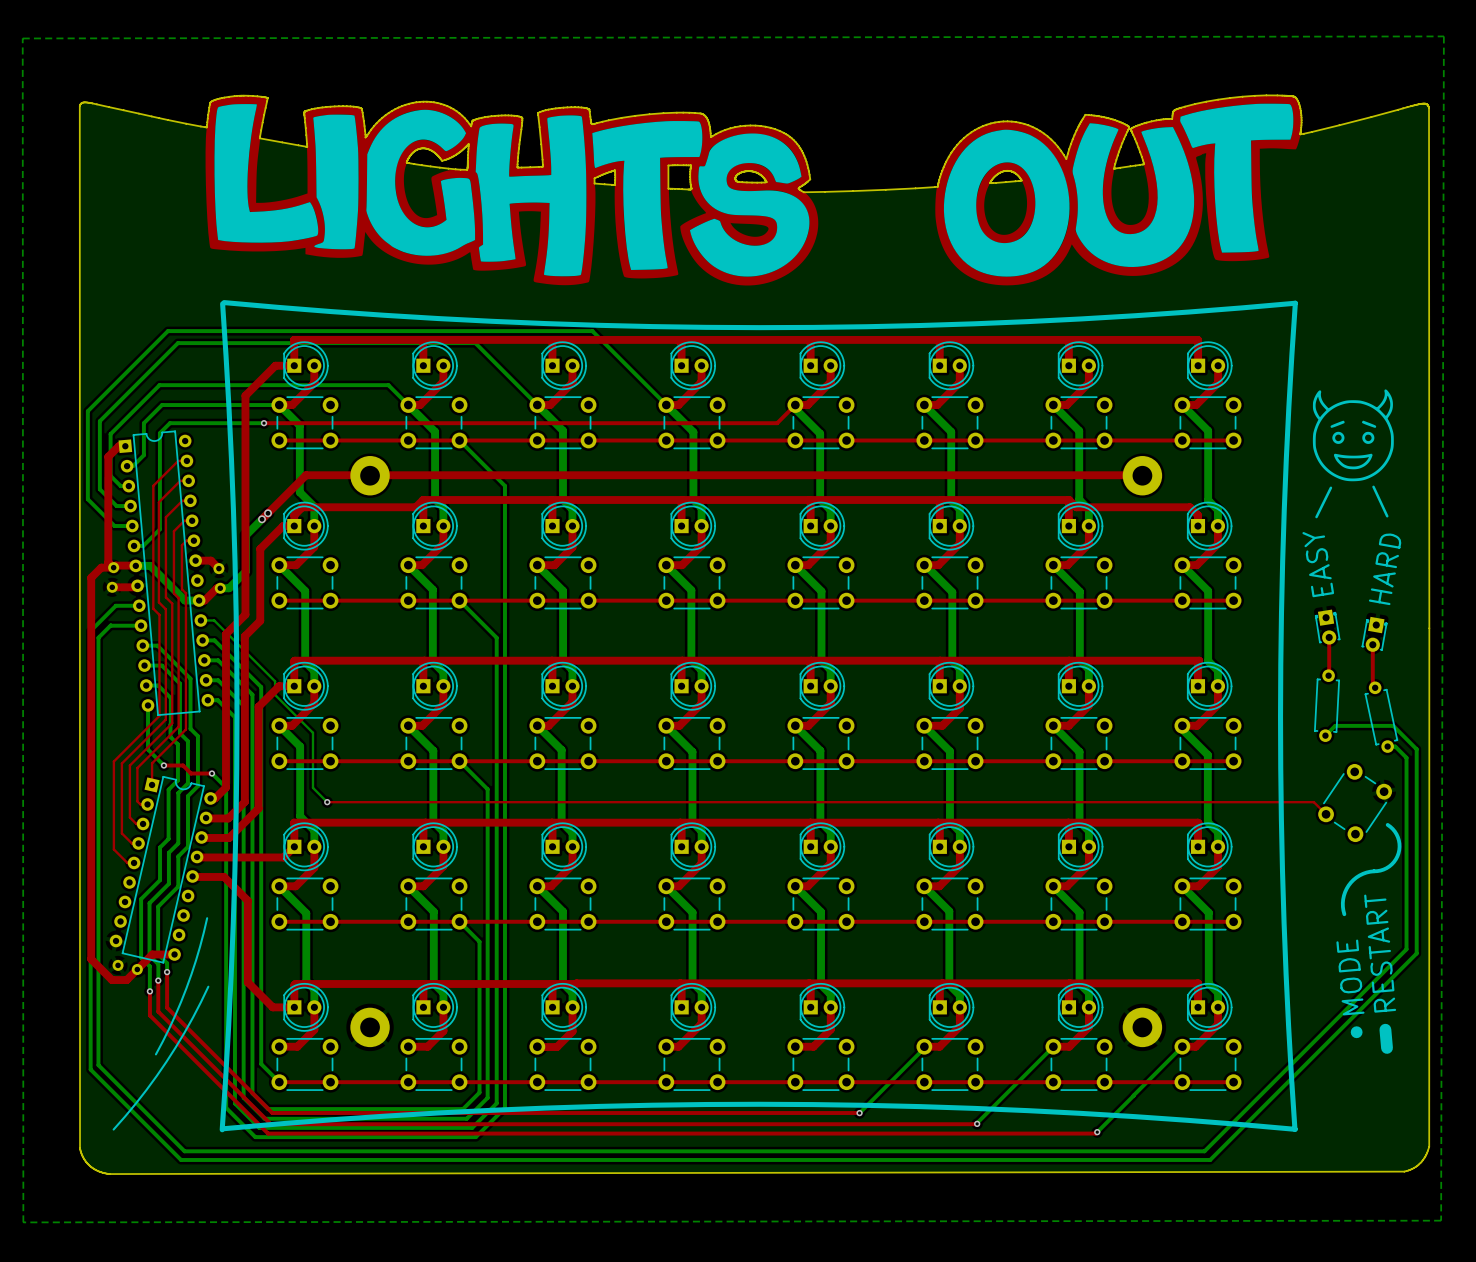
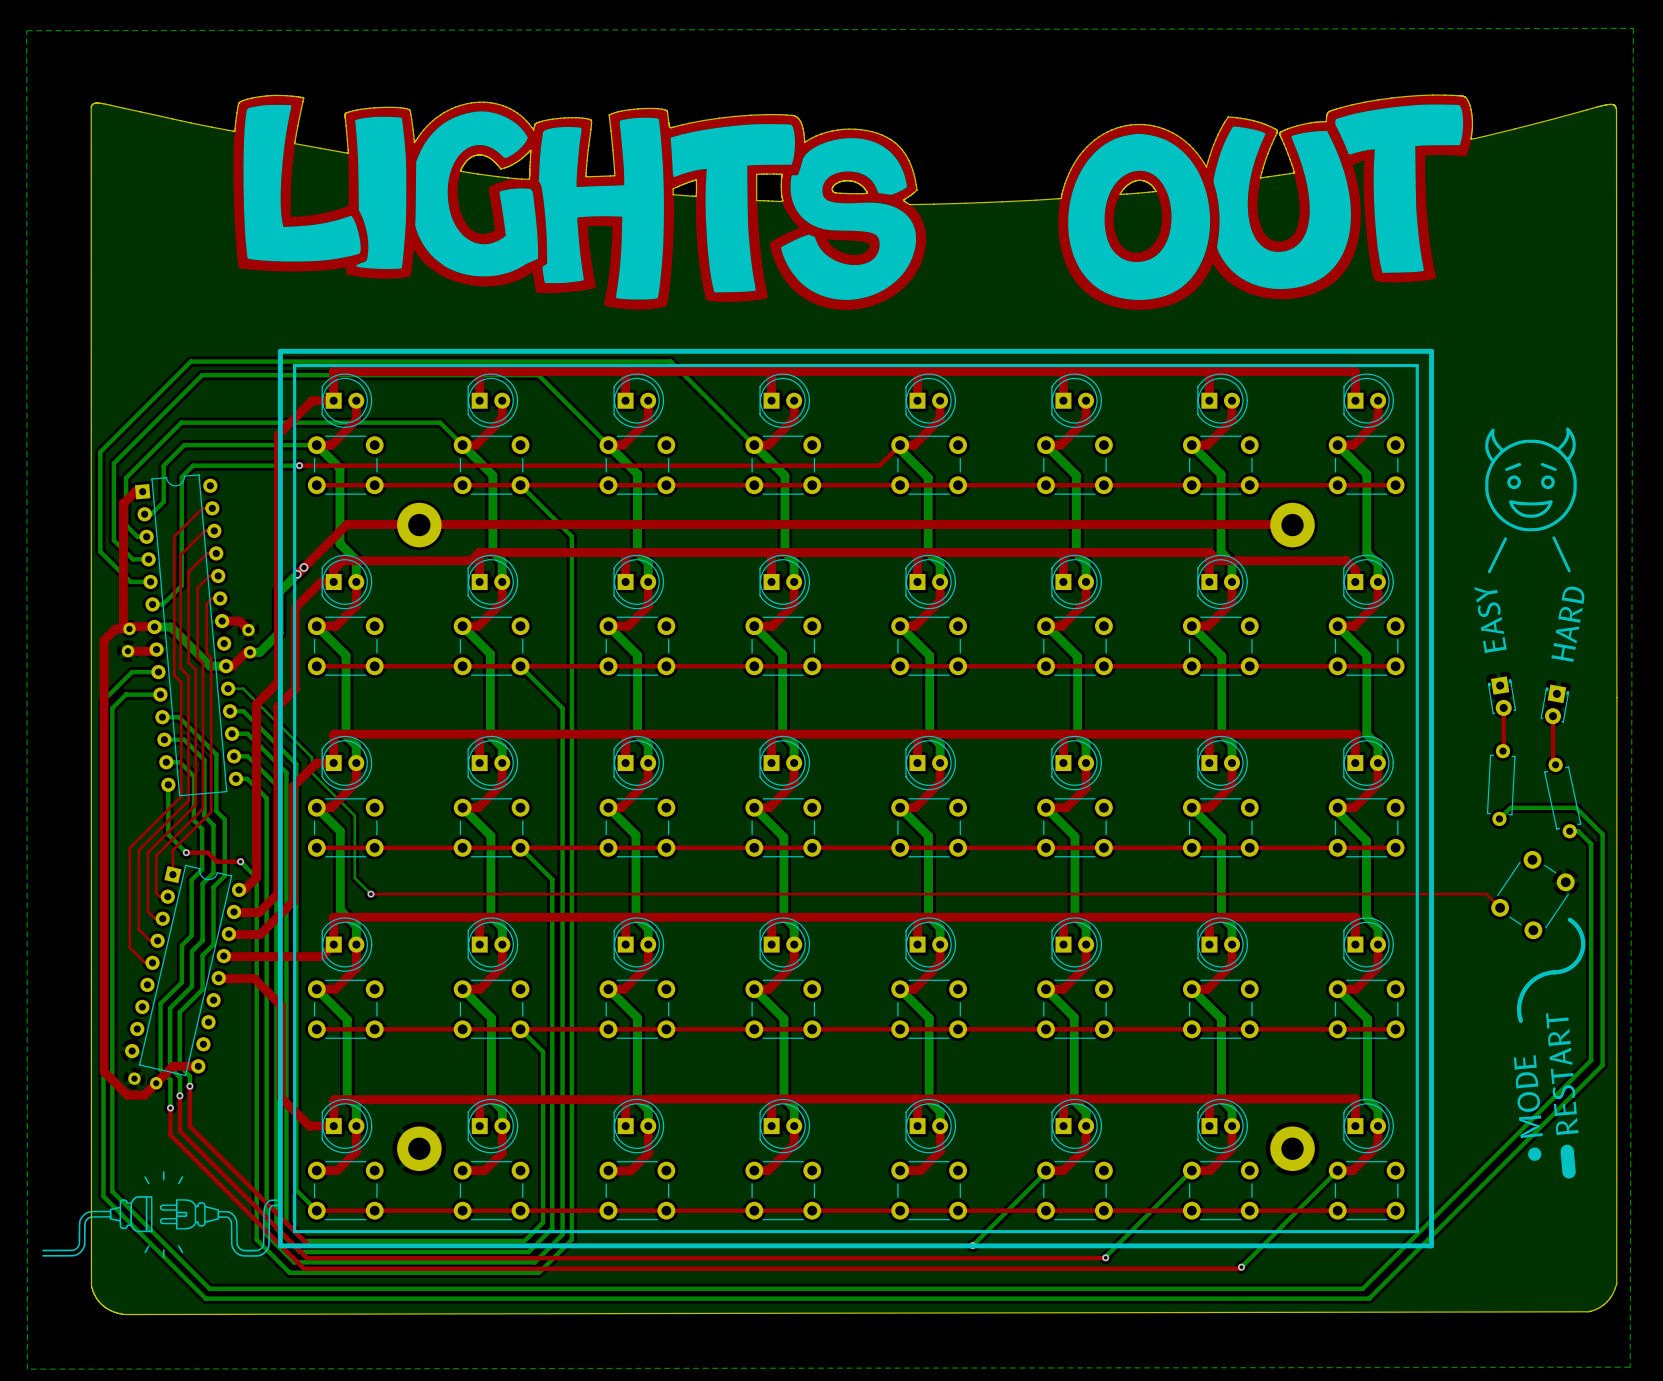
line: (224, 302) (491, 321) (759, 327) (1027, 321) (1295, 303) (1284, 509) (1280, 716) (1284, 922) (1294, 1129) -> none
line: (222, 303) (233, 510) (237, 716) (233, 923) (222, 1129) -> none
line: none -> (280, 351) (1431, 351) (1431, 1245) (280, 1245) (280, 351)
line: none -> (294, 365) (1417, 365) (1417, 1231) (294, 1231) (294, 365)
line: (207, 918) (186, 988) (155, 1054) -> none
line: (208, 986) (184, 1032) (166, 1061) (136, 1103) (113, 1129) -> none
drawing: none -> [162, 1171, 165, 1181]
drawing: none -> [144, 1176, 150, 1185]
drawing: none -> [177, 1176, 184, 1185]
drawing: none -> [42, 1196, 278, 1259]
line: (224, 1128) (491, 1110) (759, 1104) (1027, 1110) (1295, 1129) -> none

